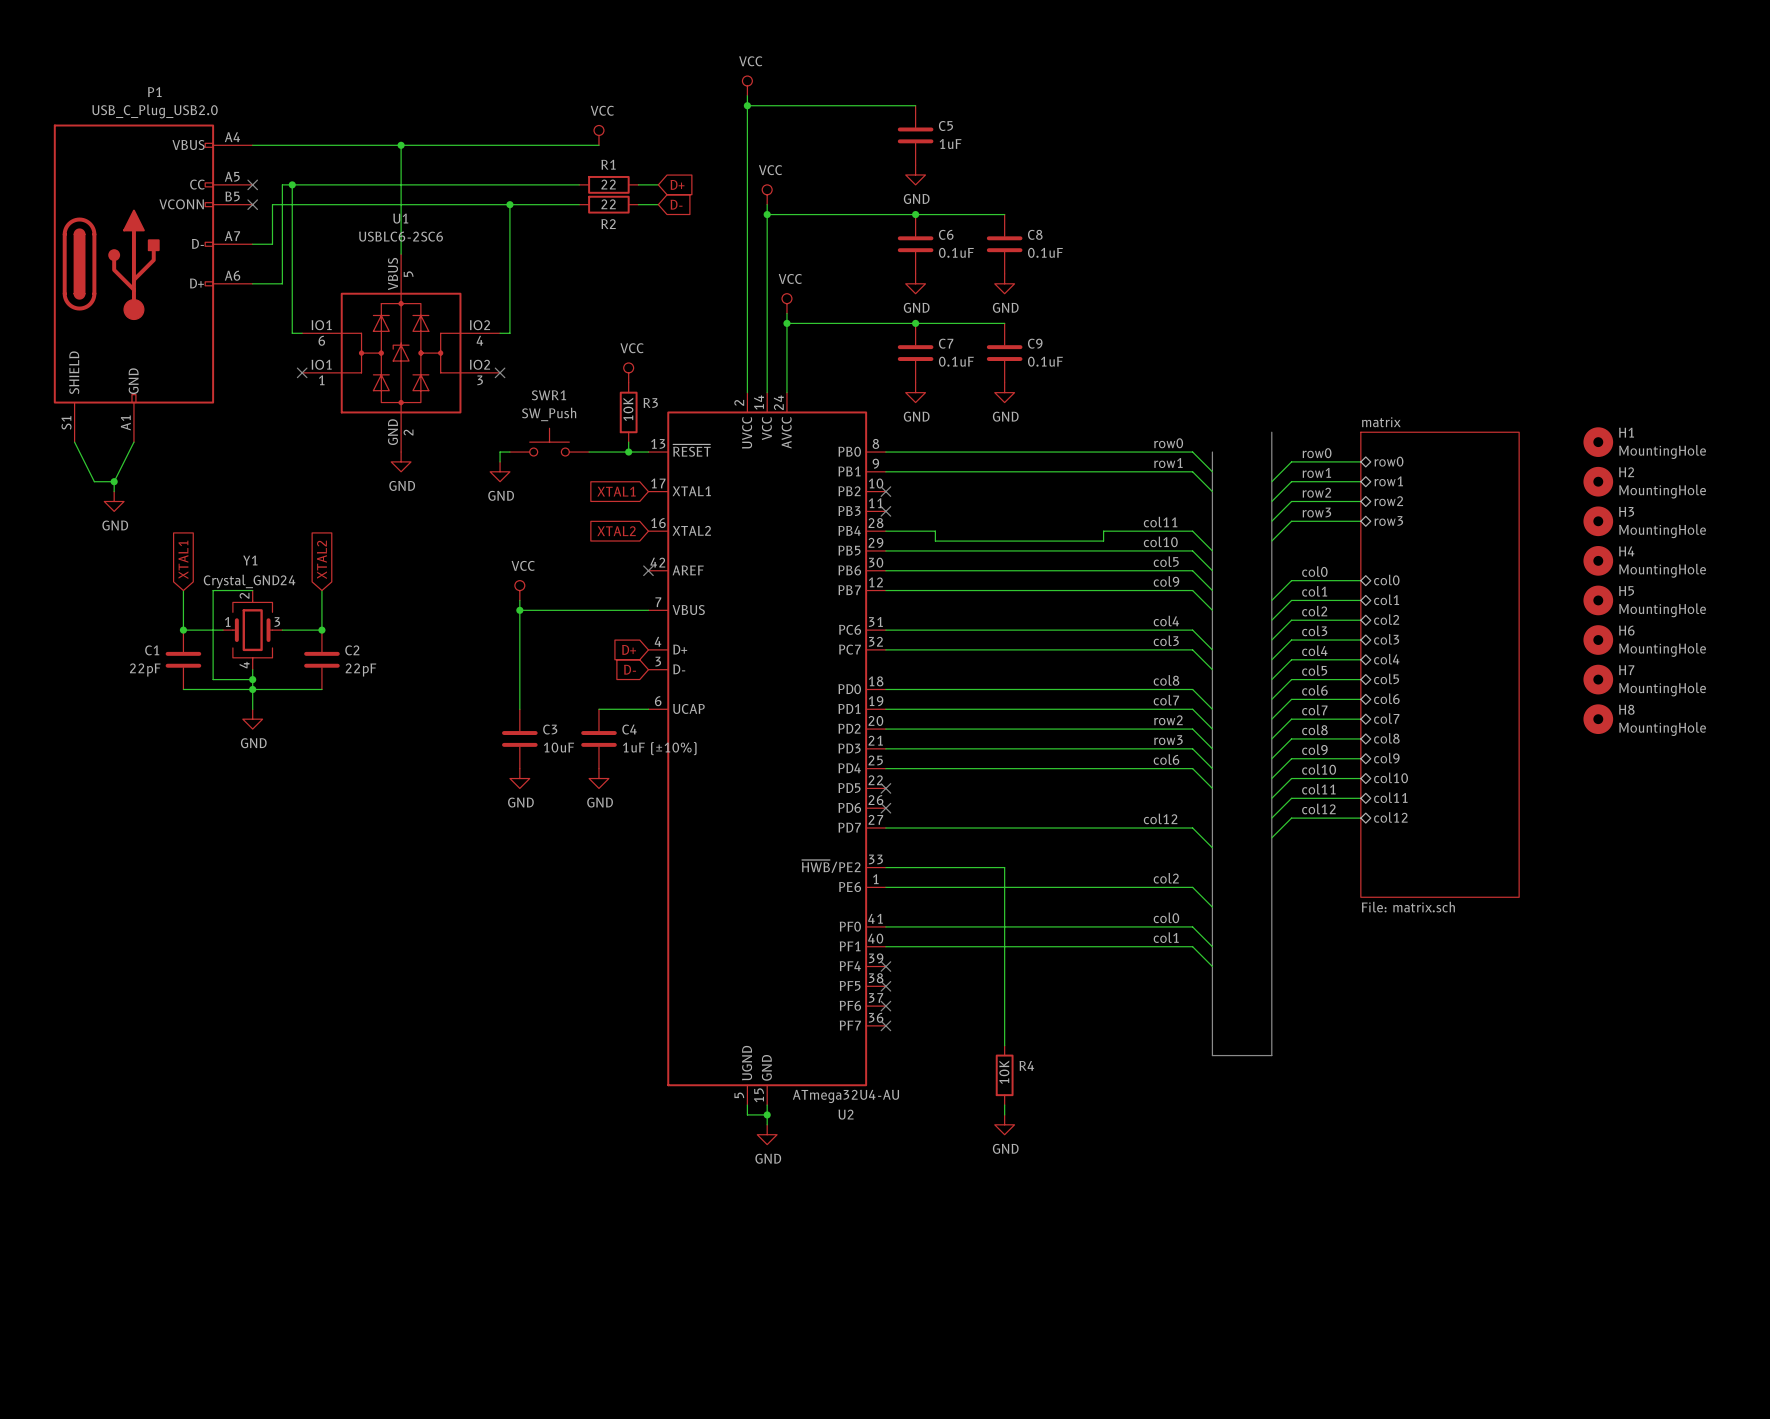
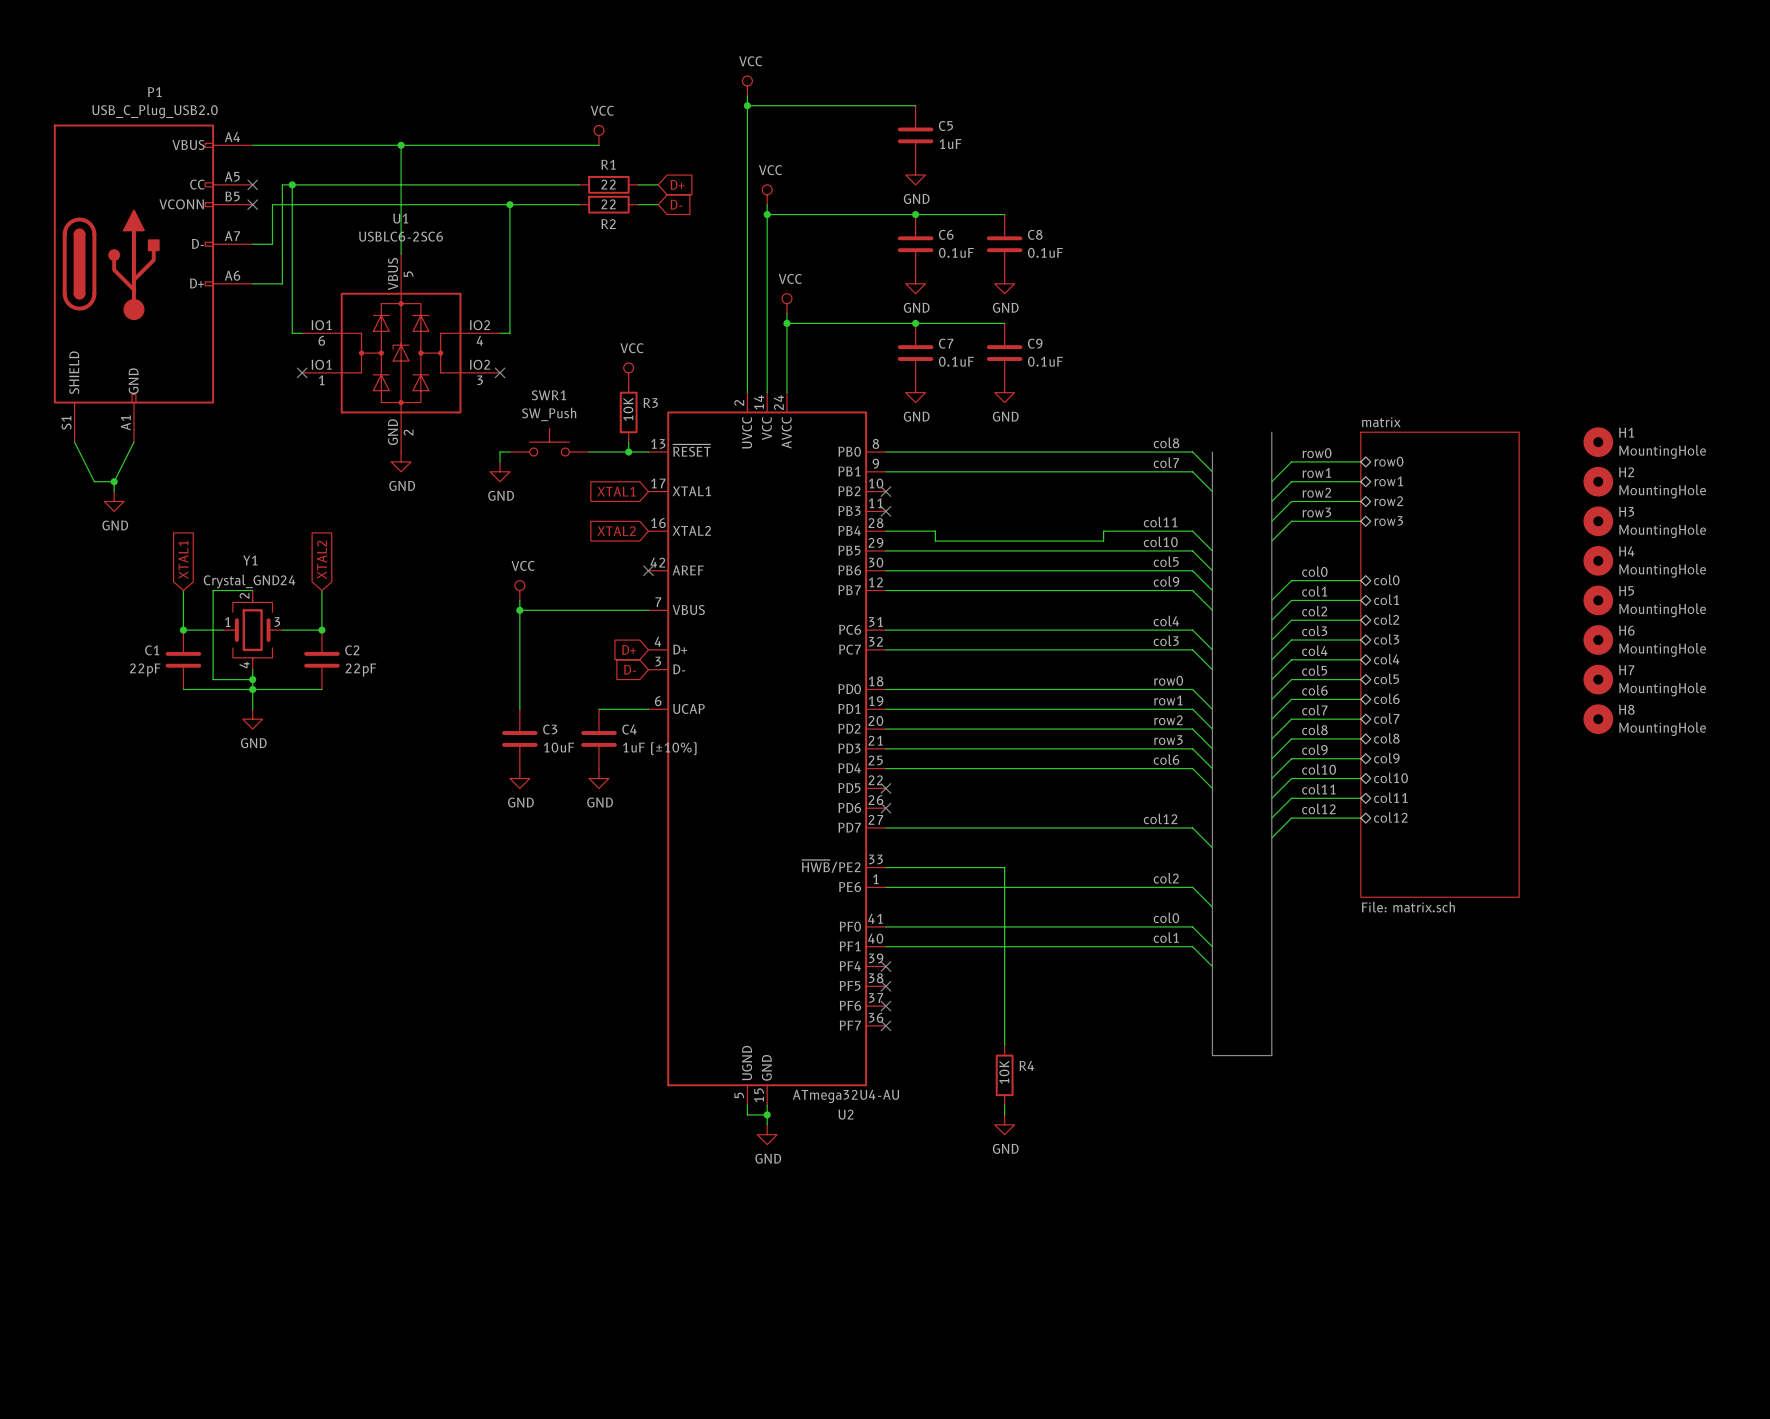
label: row0 (1168, 443) -> col8 (1166, 442)
label: row1 (1168, 463) -> col7 (1166, 462)
label: col8 (1166, 680) -> row0 (1168, 680)
label: col7 (1166, 700) -> row1 (1168, 700)

